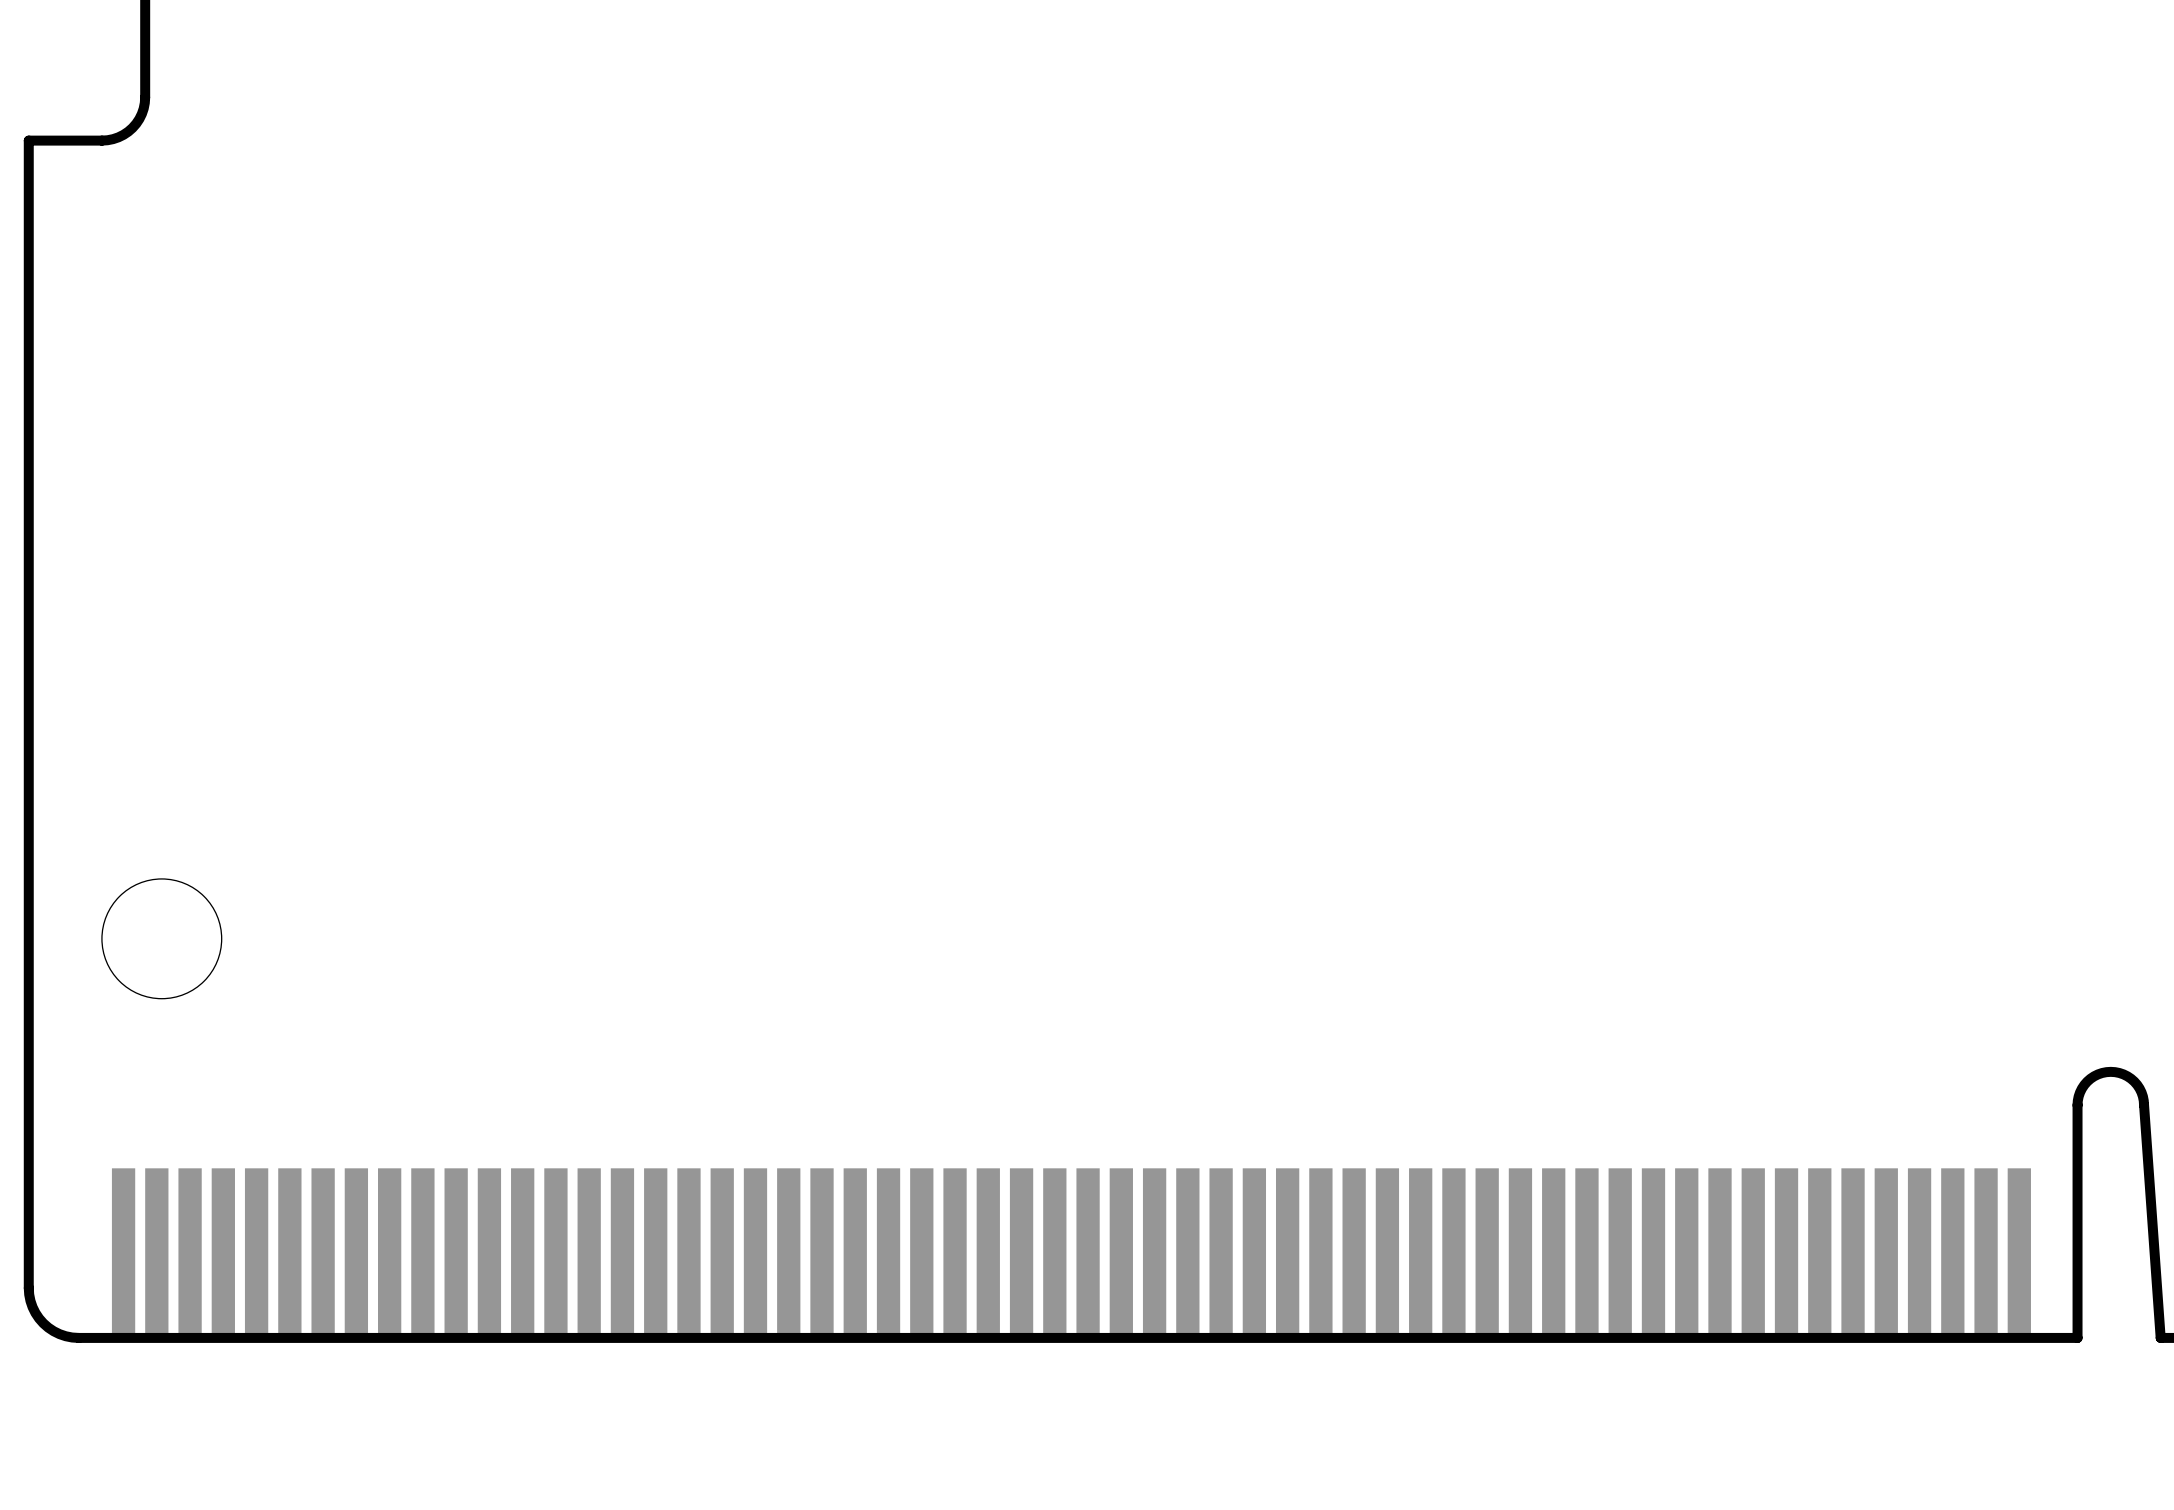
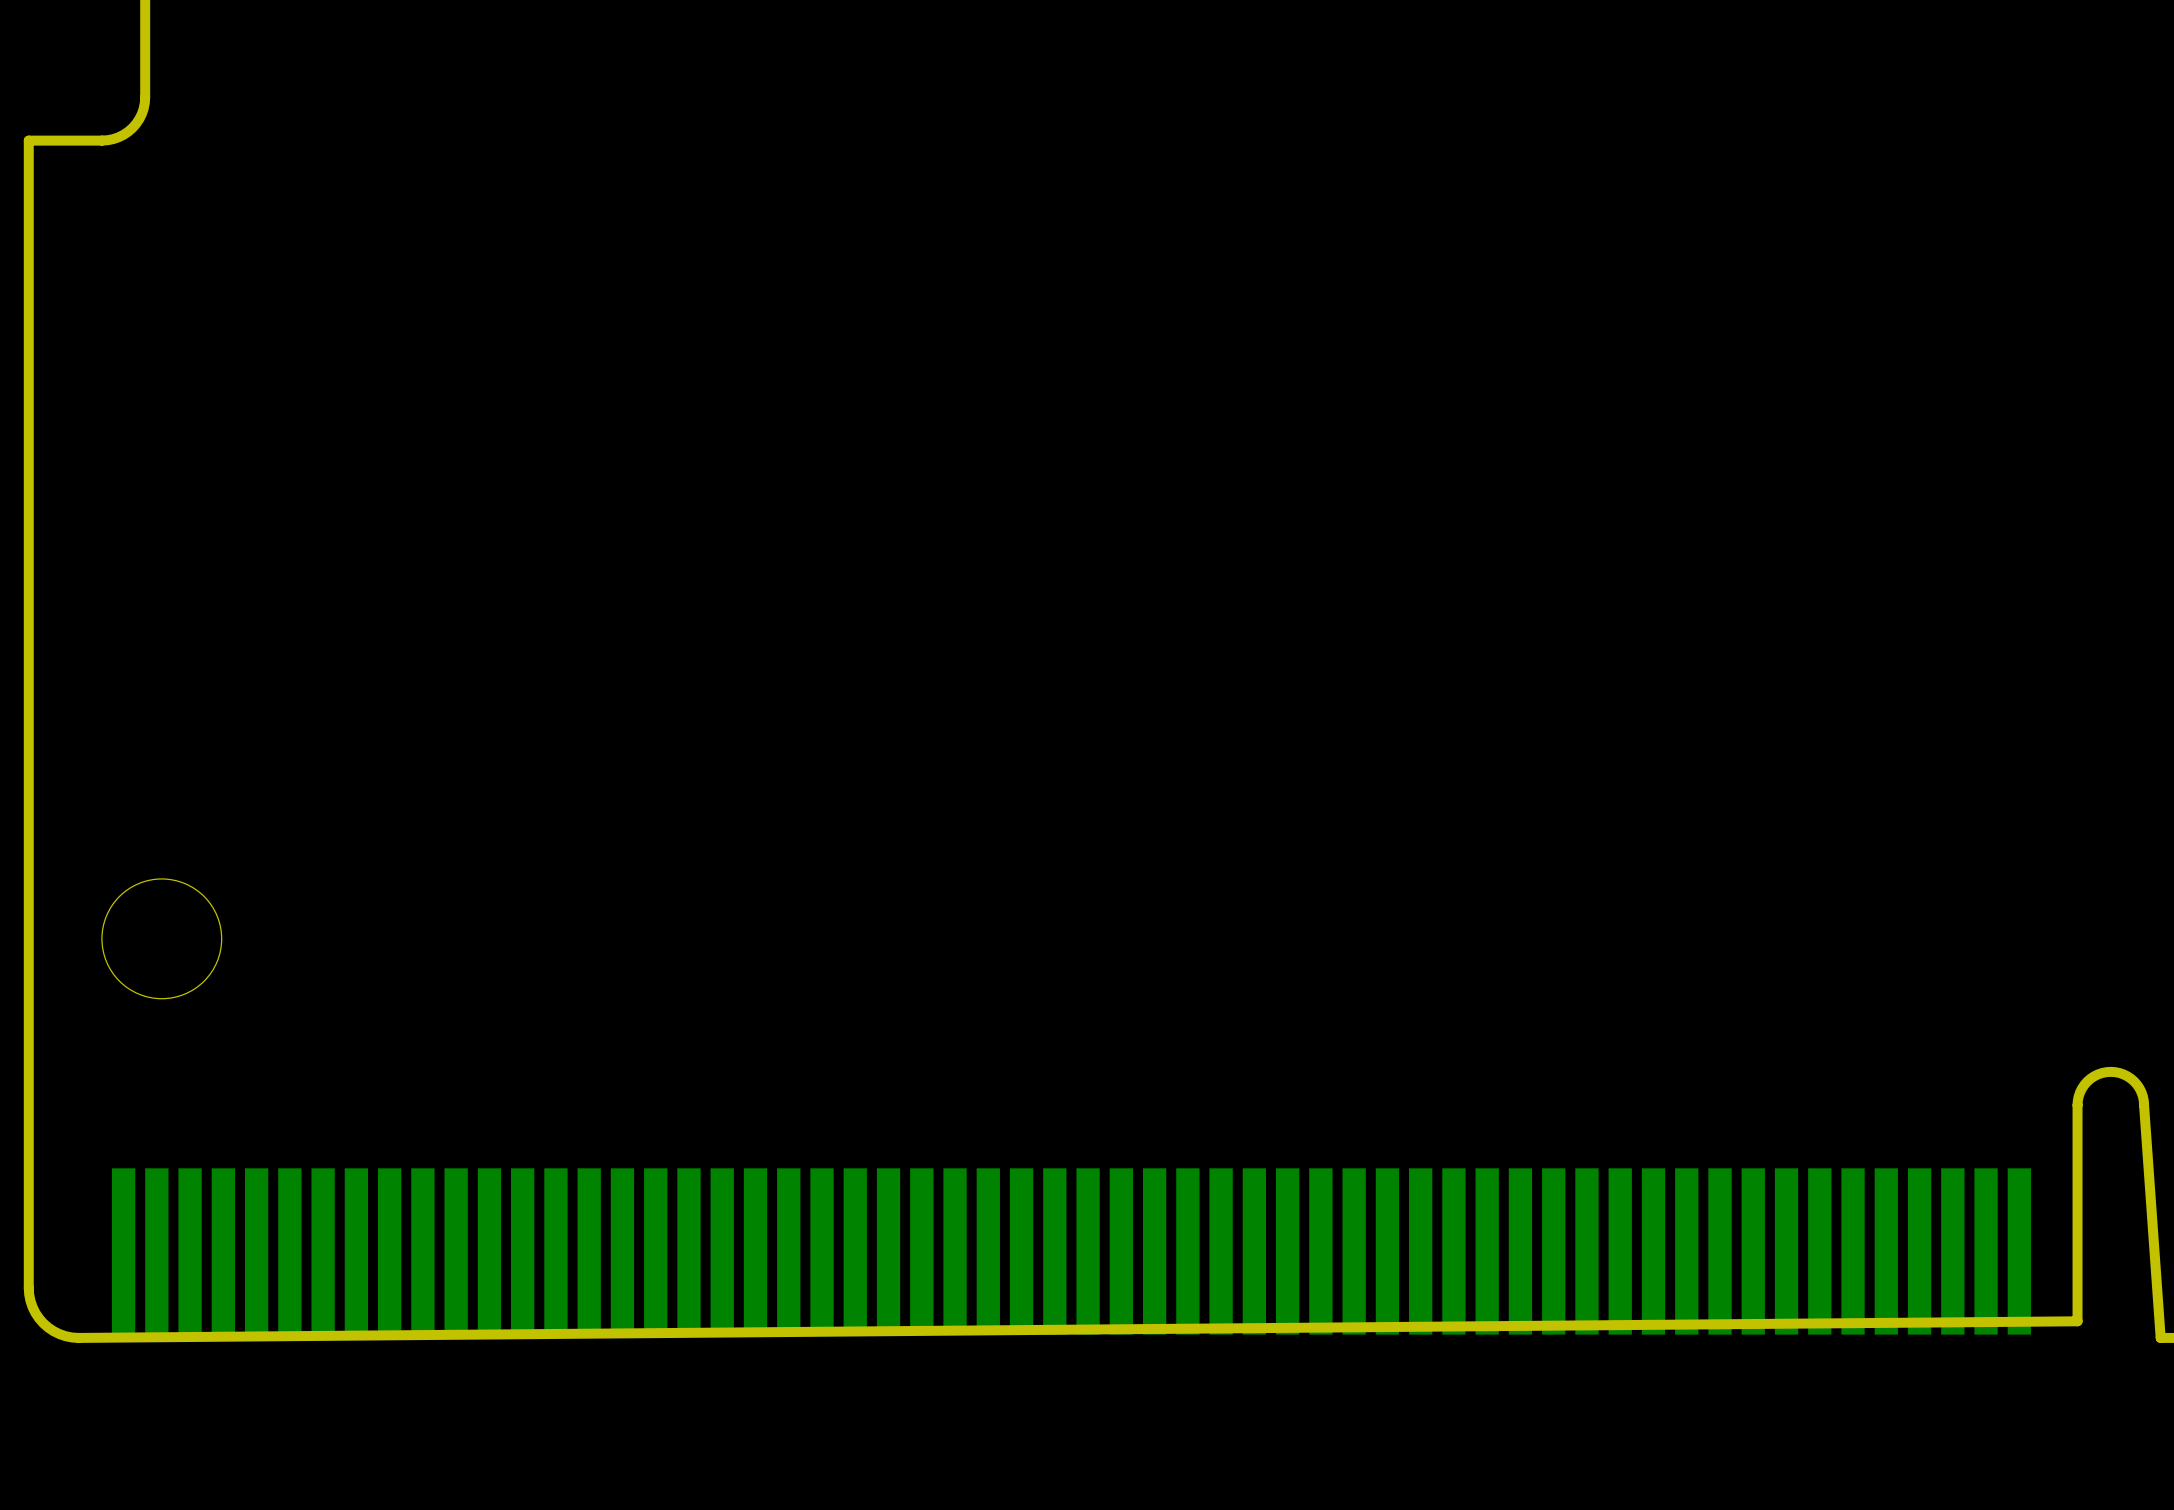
board edge: (2077, 1321) (2077, 1337) (78, 1337) -> (2077, 1321) (78, 1337)

